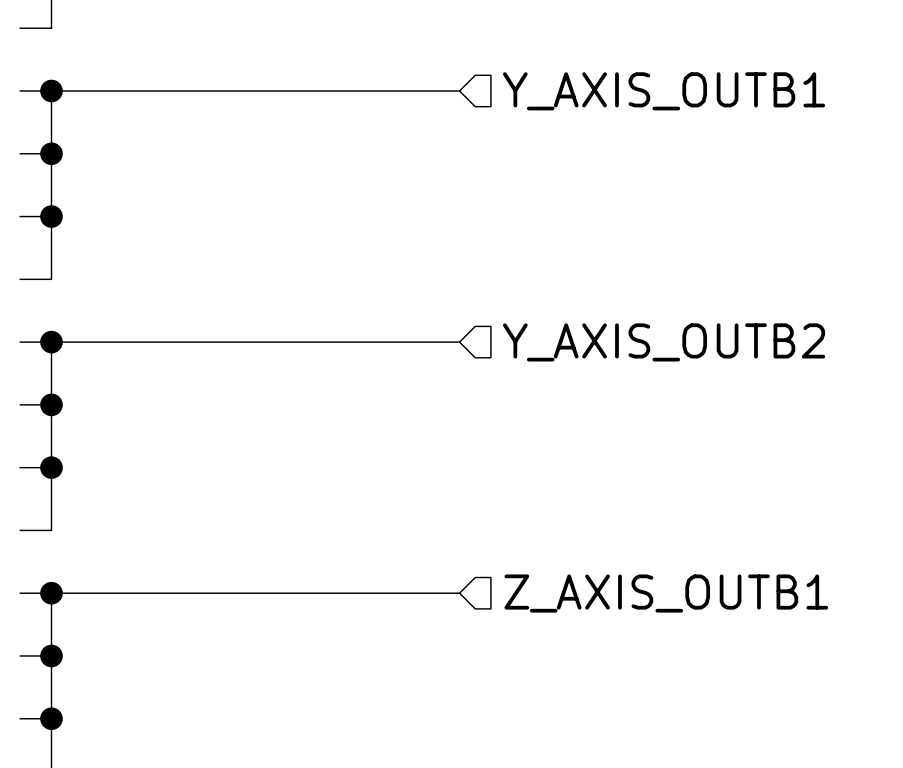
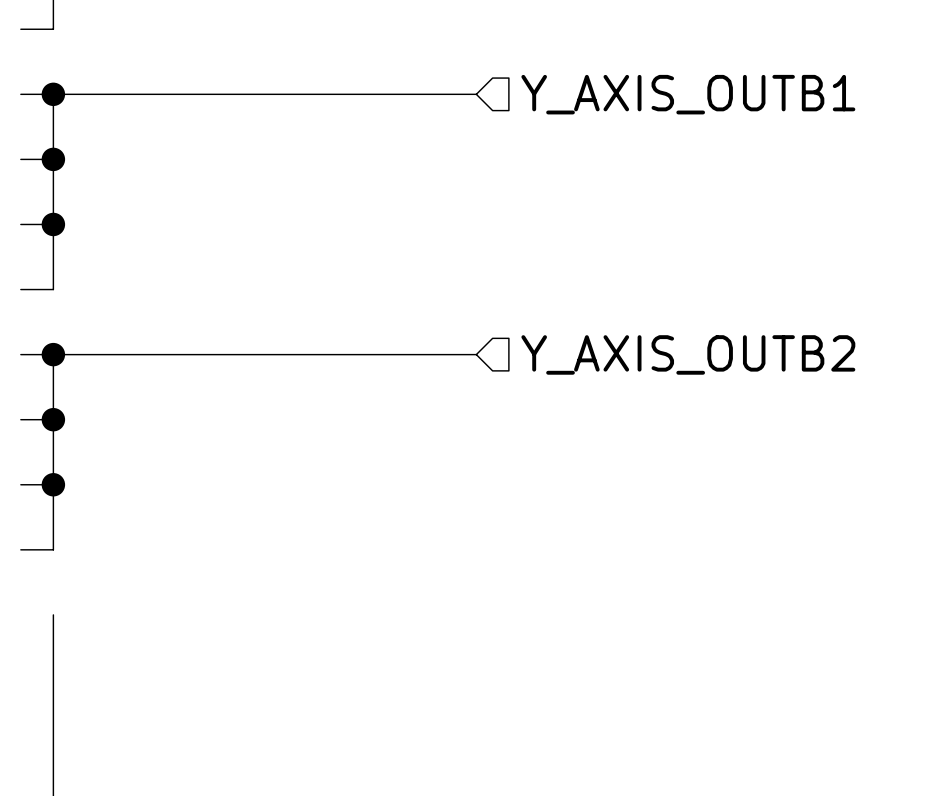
wire: (20, 593) (459, 593) -> none
junction: (51, 593) -> none
hierarchical label: Z_AXIS_OUTB1 (666, 593) -> none
wire: (20, 655) (51, 655) -> none
junction: (51, 655) -> none
wire: (20, 718) (51, 718) -> none
junction: (51, 718) -> none

